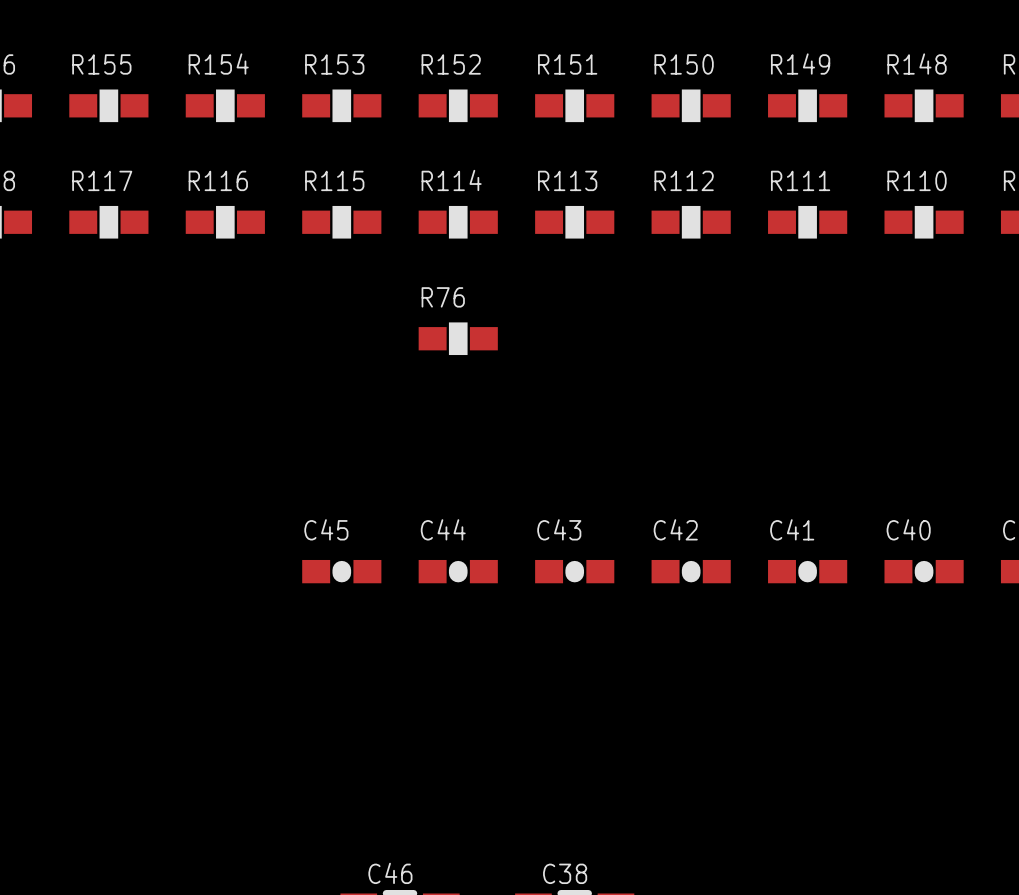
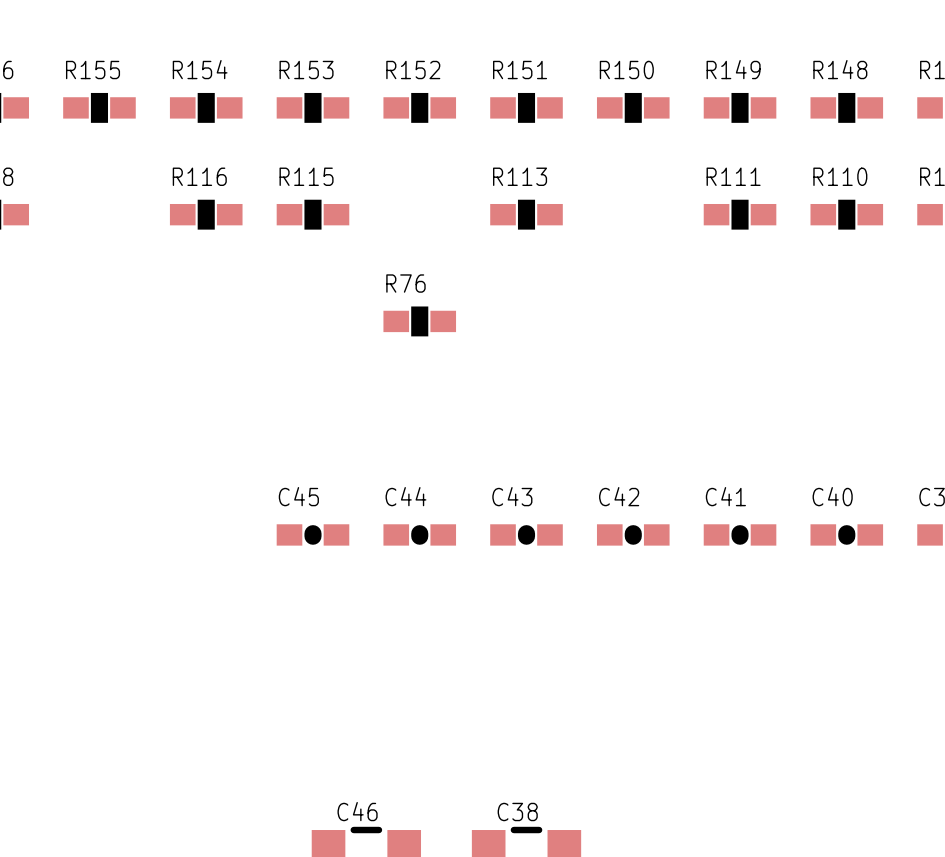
R117: (108, 222) -> none
R114: (458, 222) -> none
R112: (691, 222) -> none

